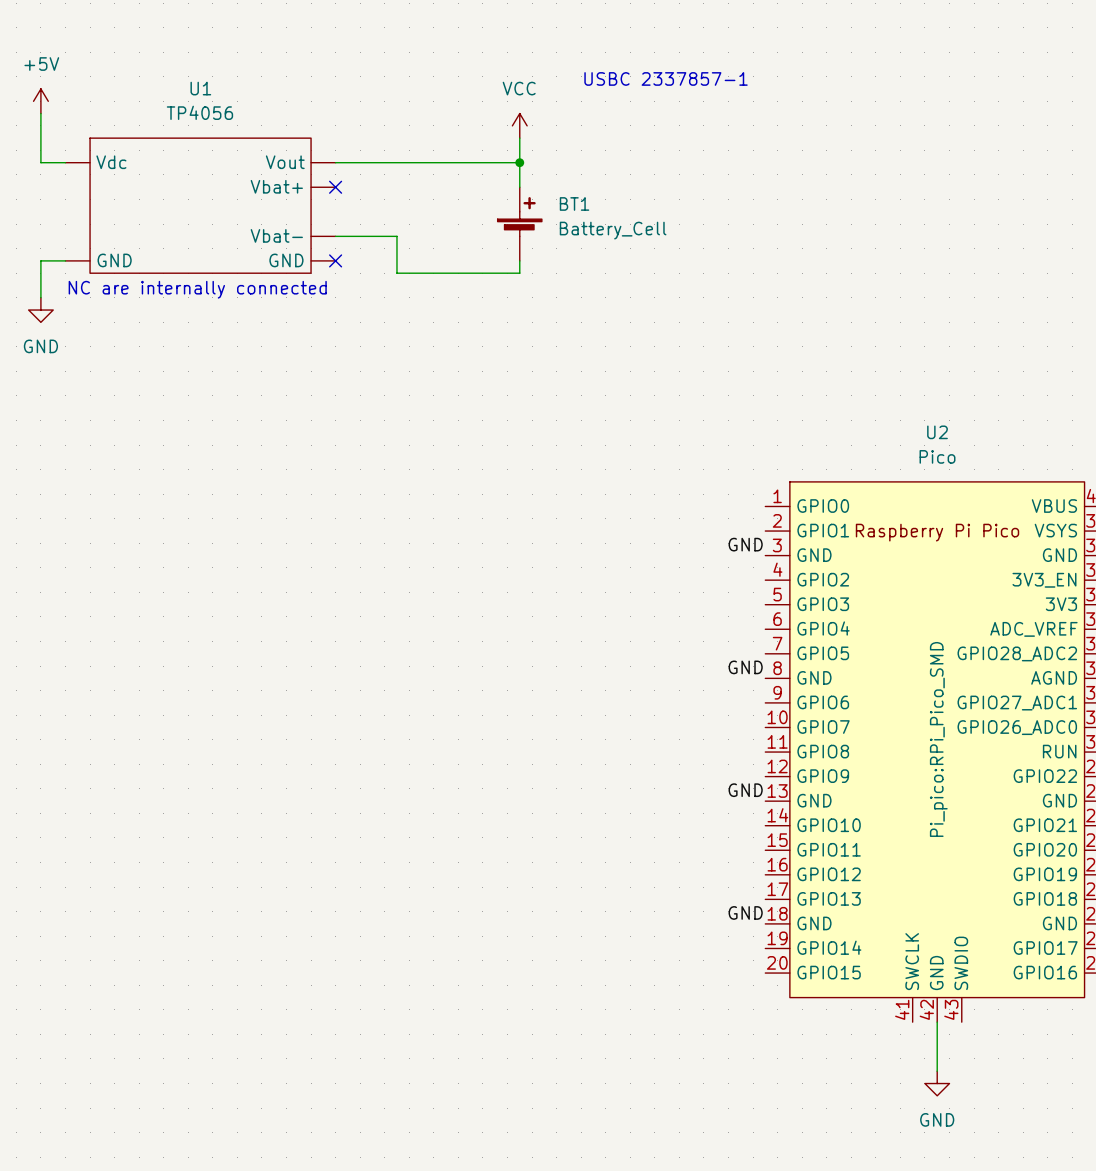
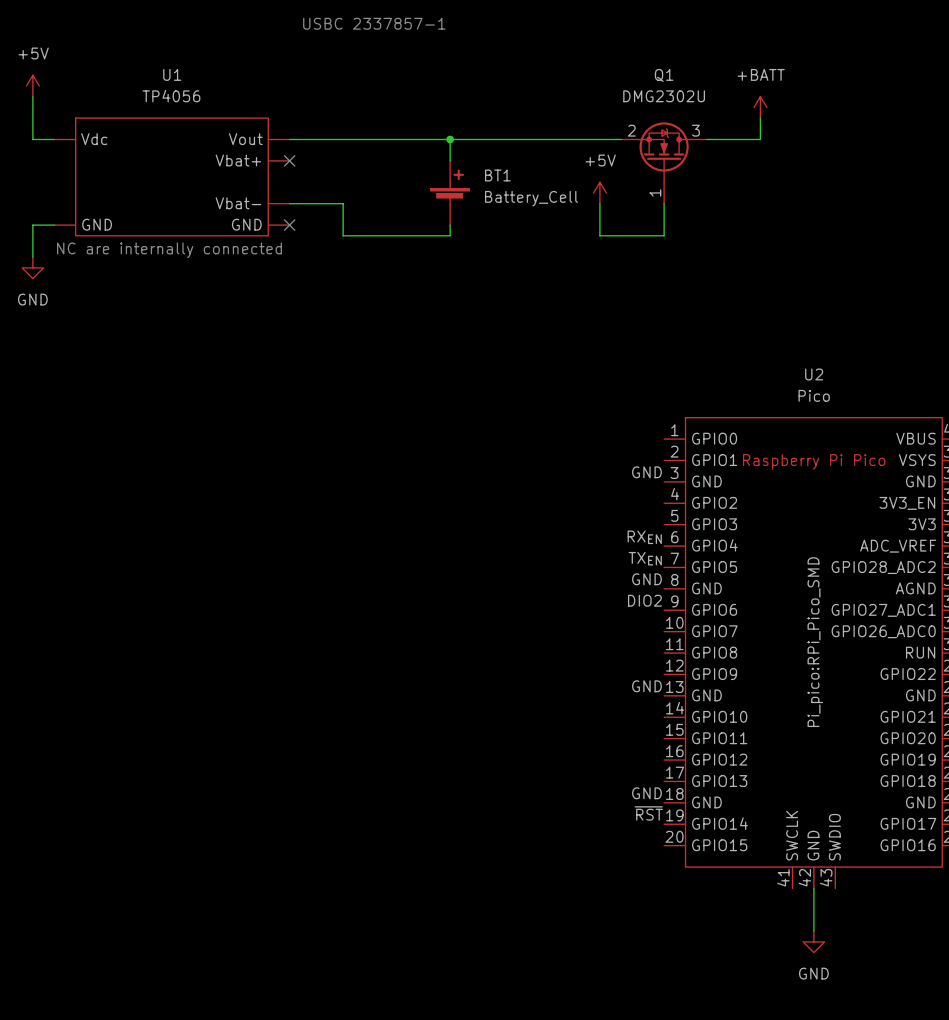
text position: USBC 2337857-1 (666, 78) -> USBC 2337857-1 (374, 23)
power symbol: VCC (519, 125) -> none
power symbol: none -> +BATT (760, 107)
wire: (519, 138) (519, 162) -> (621, 139) (450, 139)
wire: none -> (760, 118) (760, 139) (706, 139)
Q1: none -> DMG2302U (664, 163)
power symbol: none -> +5V (599, 192)
wire: none -> (599, 203) (599, 235) (664, 235) (664, 203)
label: none -> RXEN (644, 537)
label: none -> TXEN (645, 558)
label: none -> DIO2 (644, 600)
label: none -> ~{RST} (648, 813)

